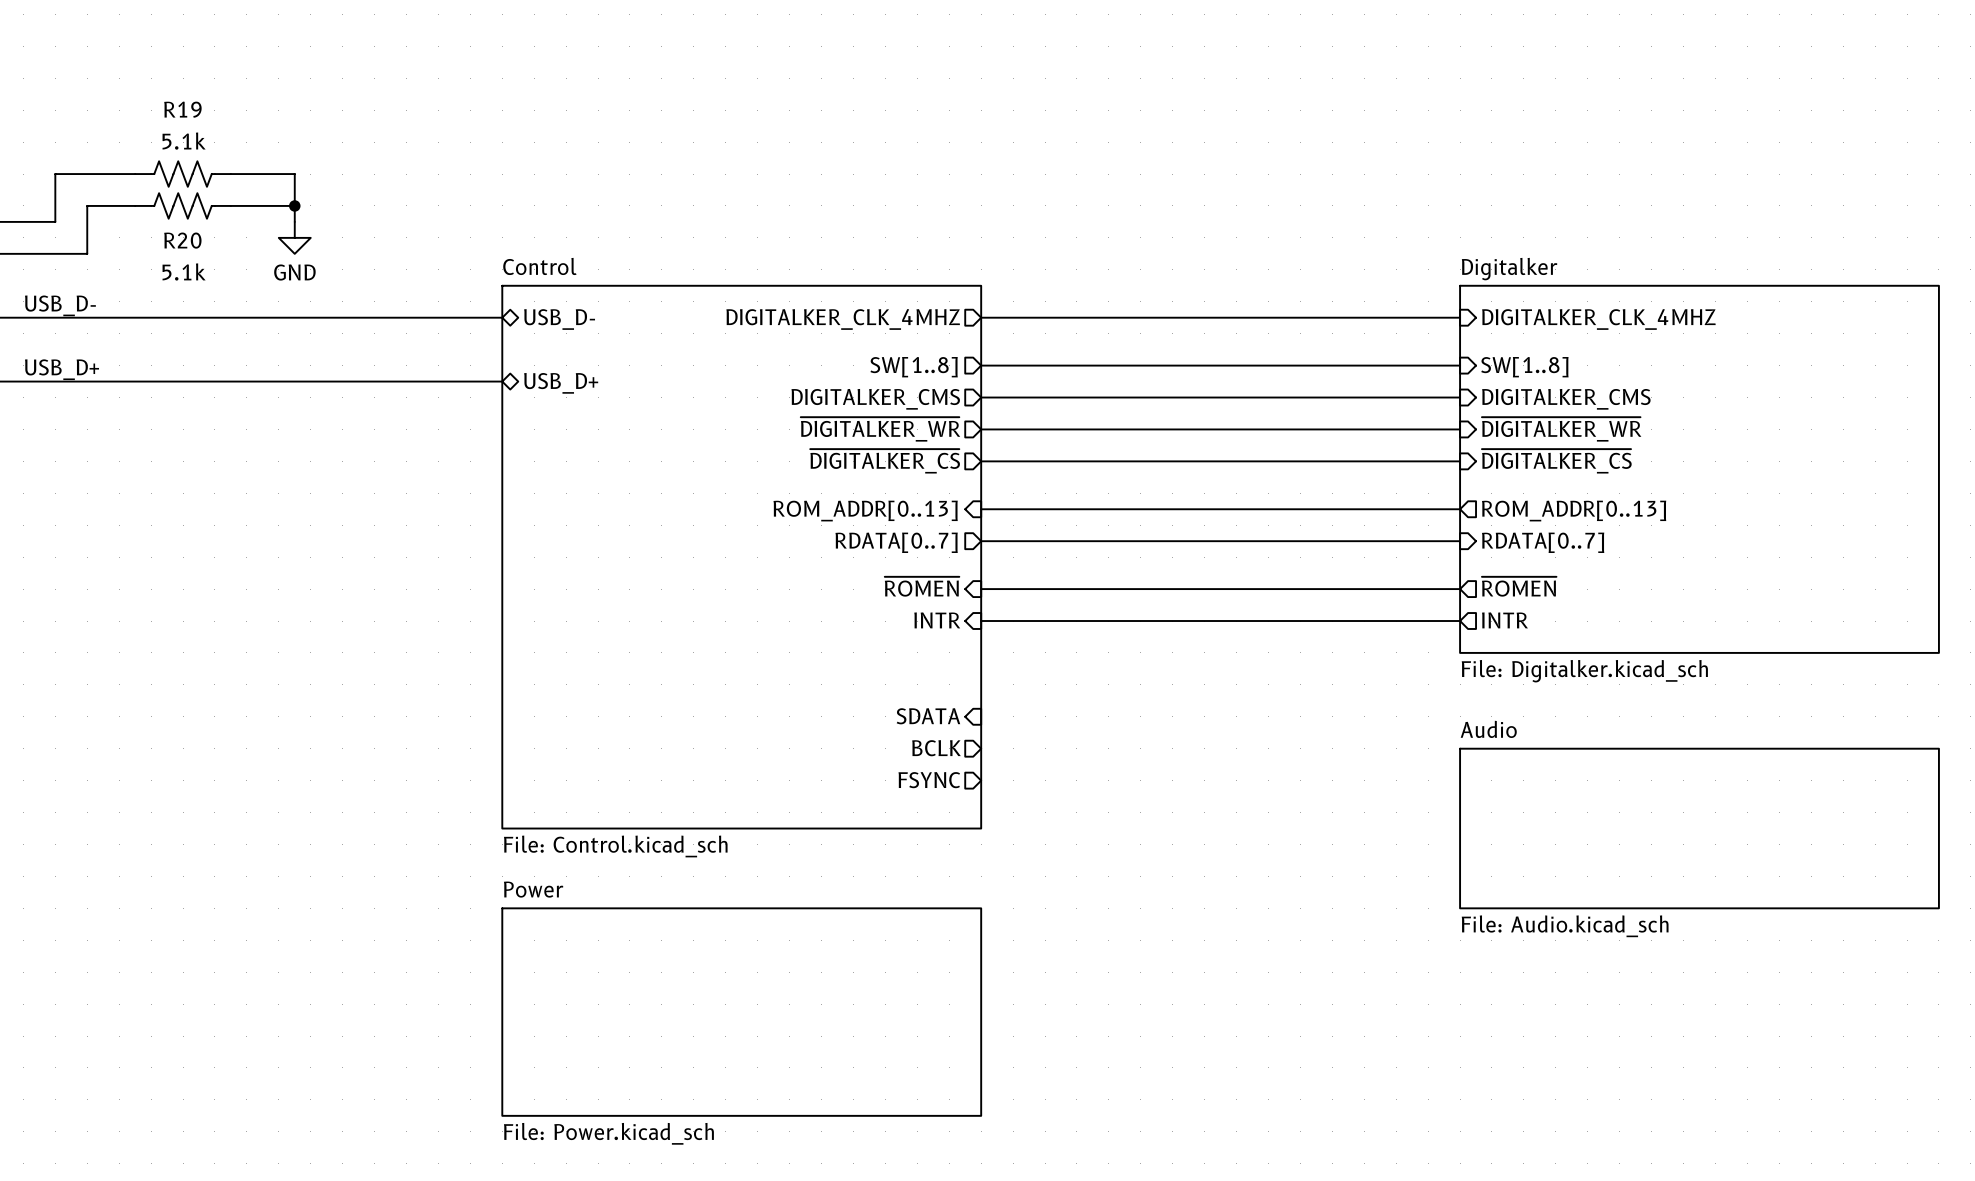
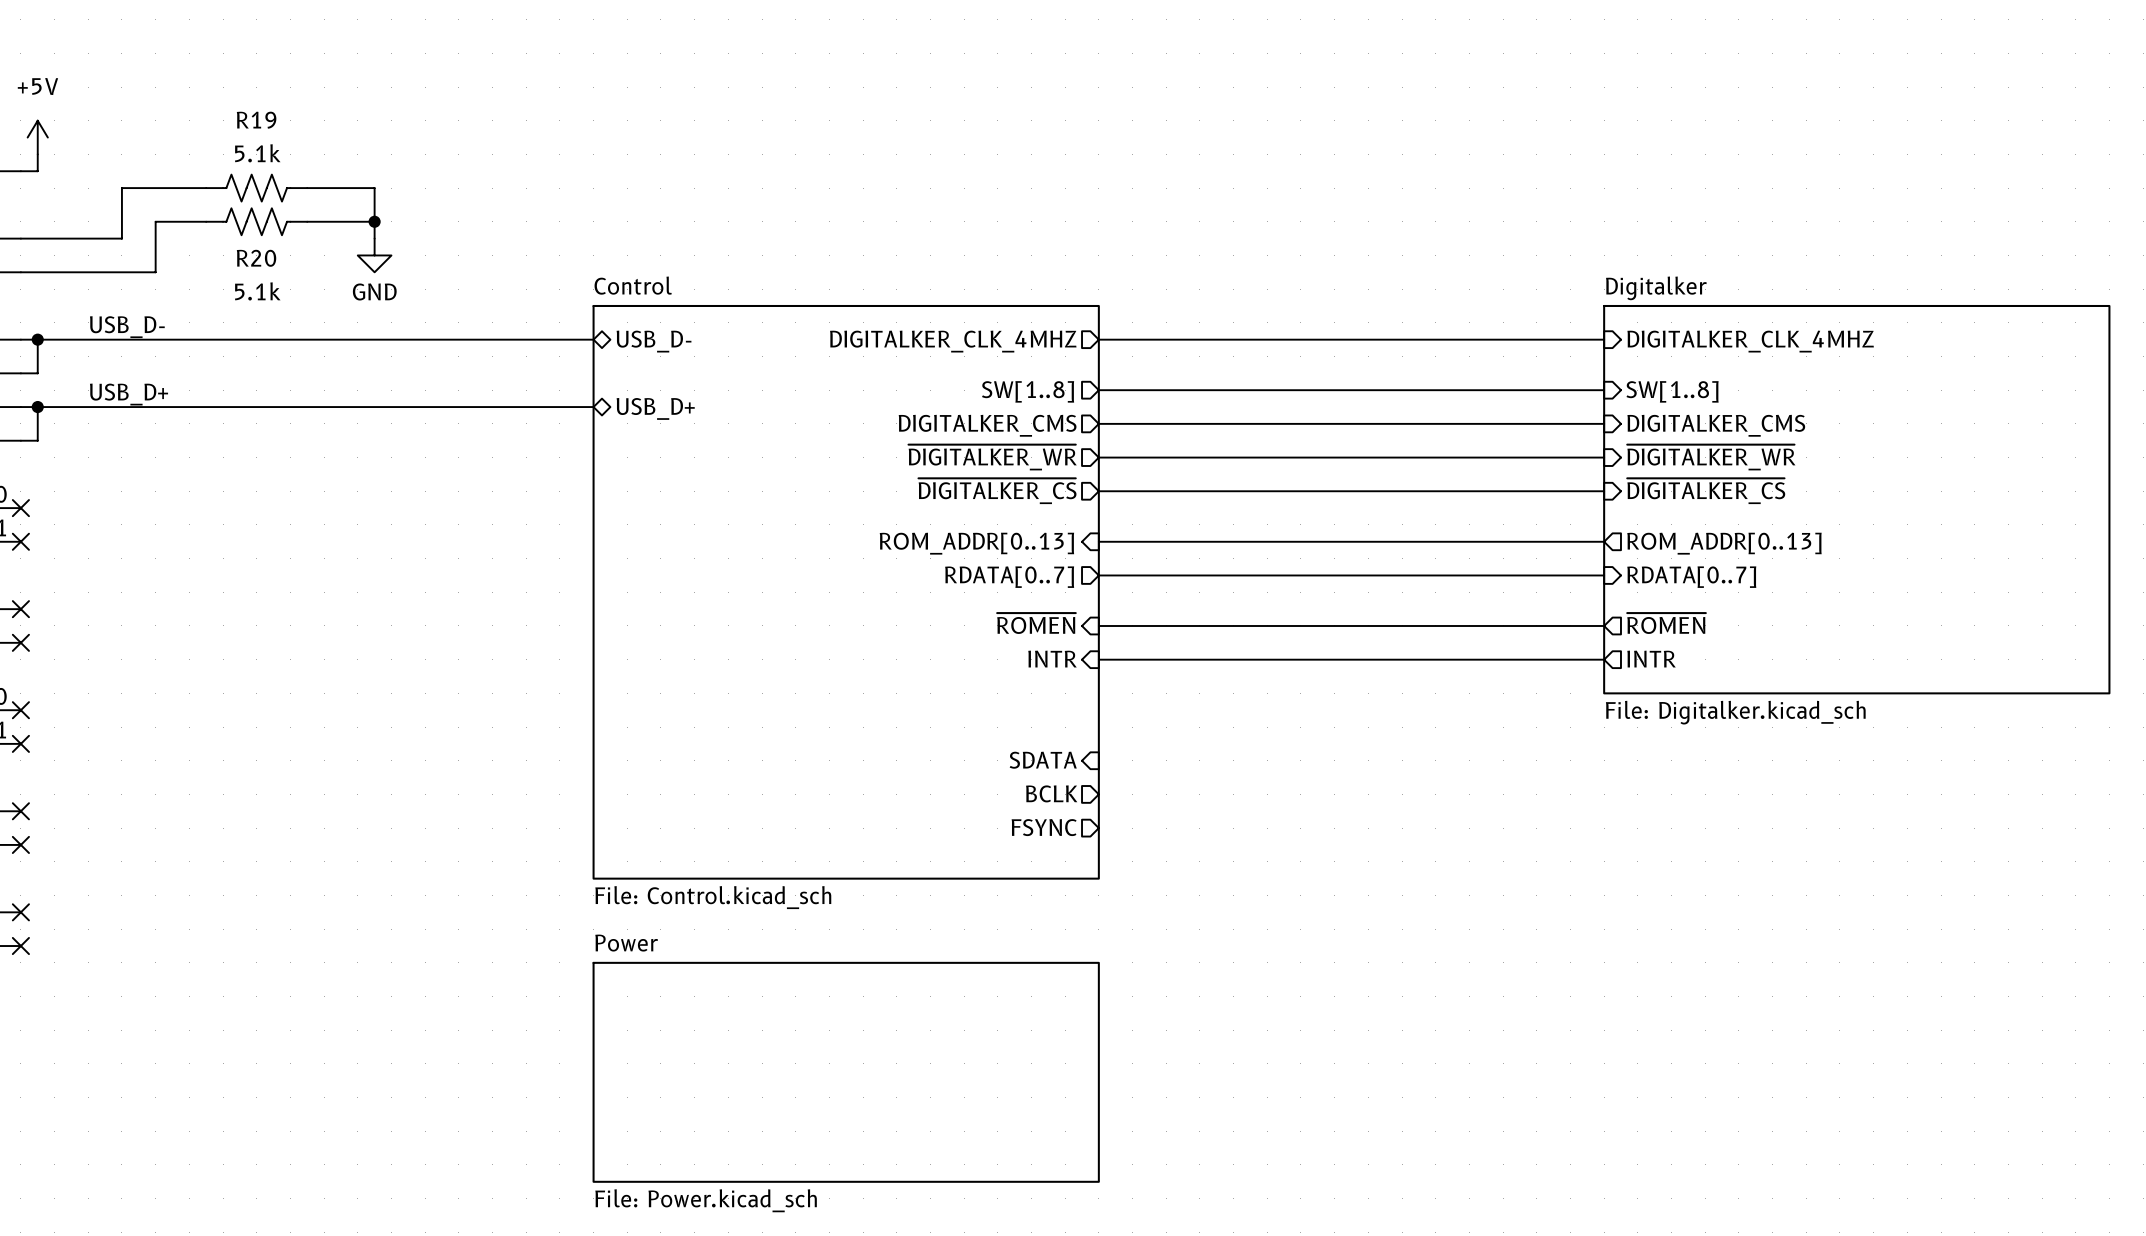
sheet Audio: File: Audio.kicad_sch (1699, 828) -> none

